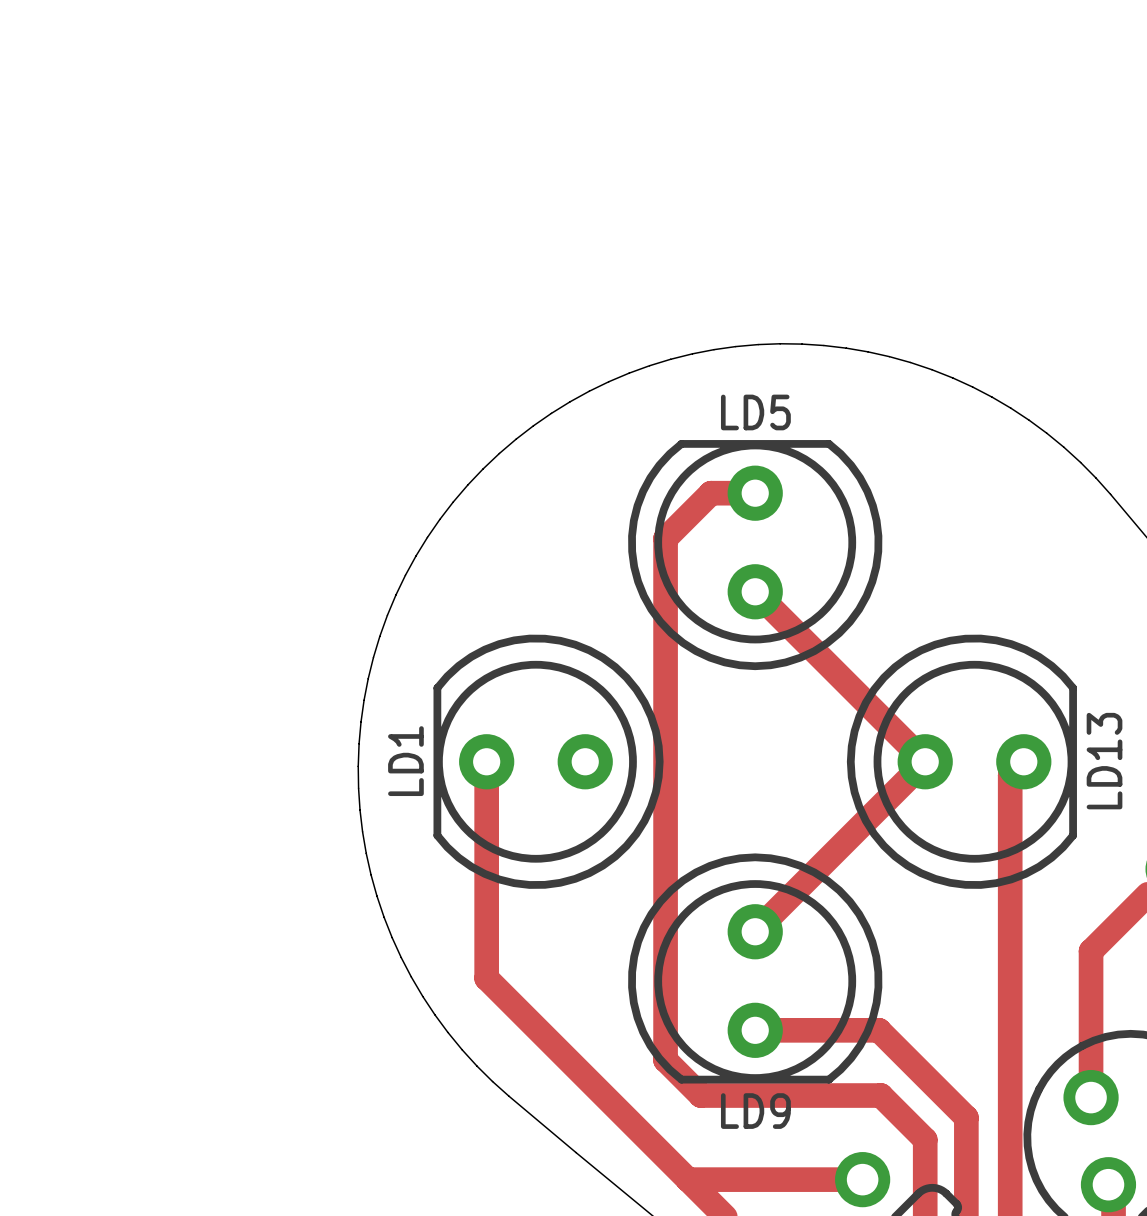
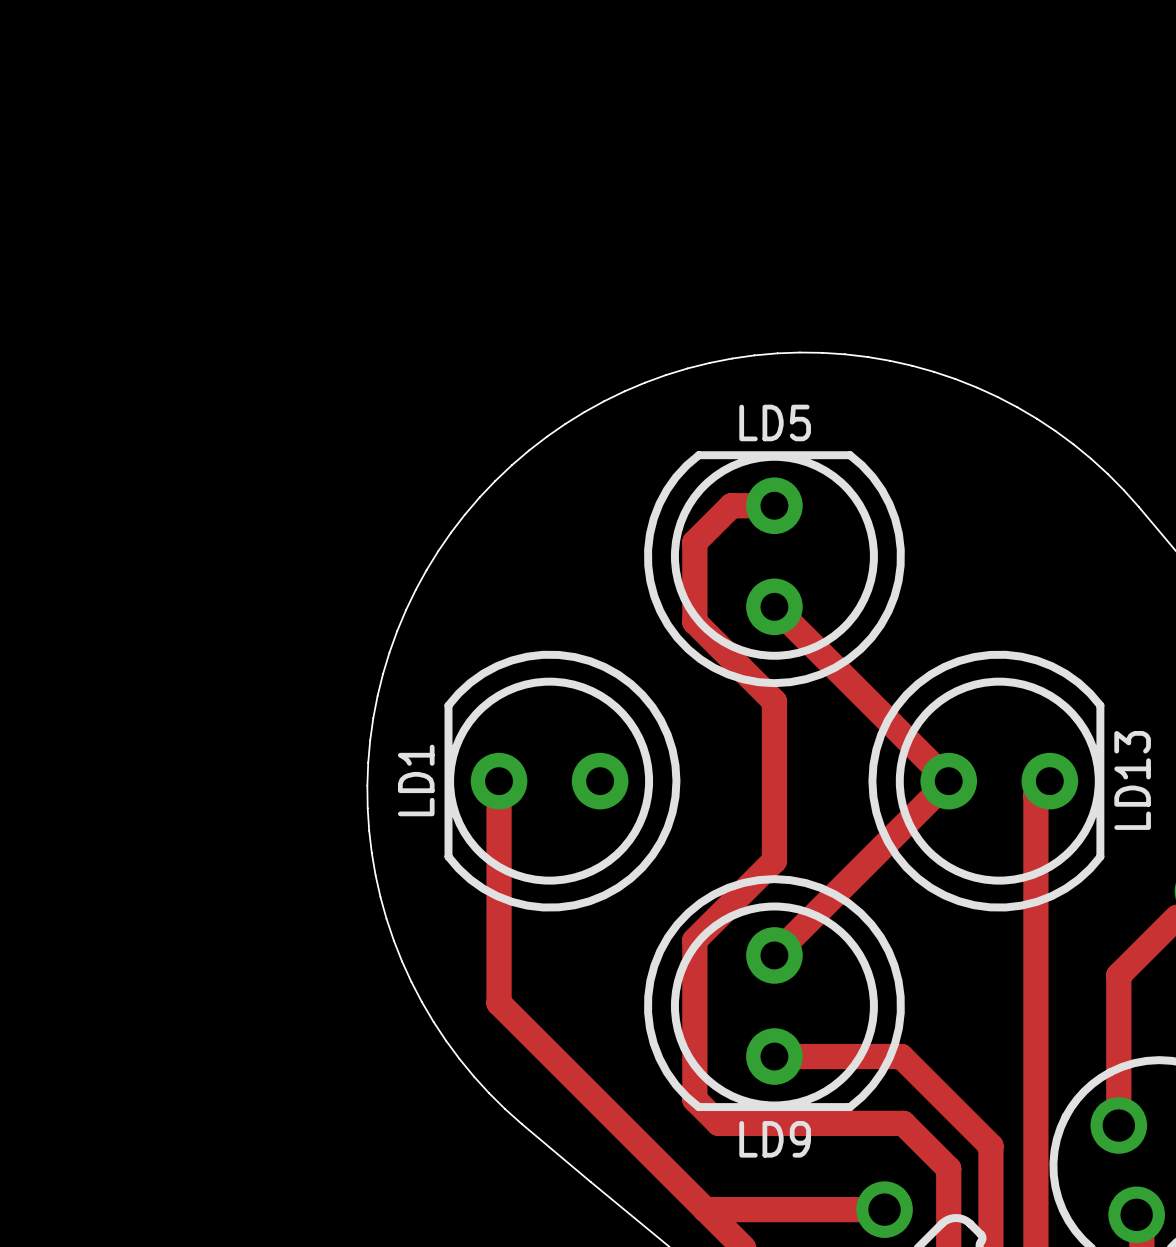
track: (713, 493) (710, 493) (665, 538) (665, 1060) (677, 1072) -> (731, 505) (694, 542) (694, 621) (774, 701) (774, 860) (694, 940) (694, 1099)

